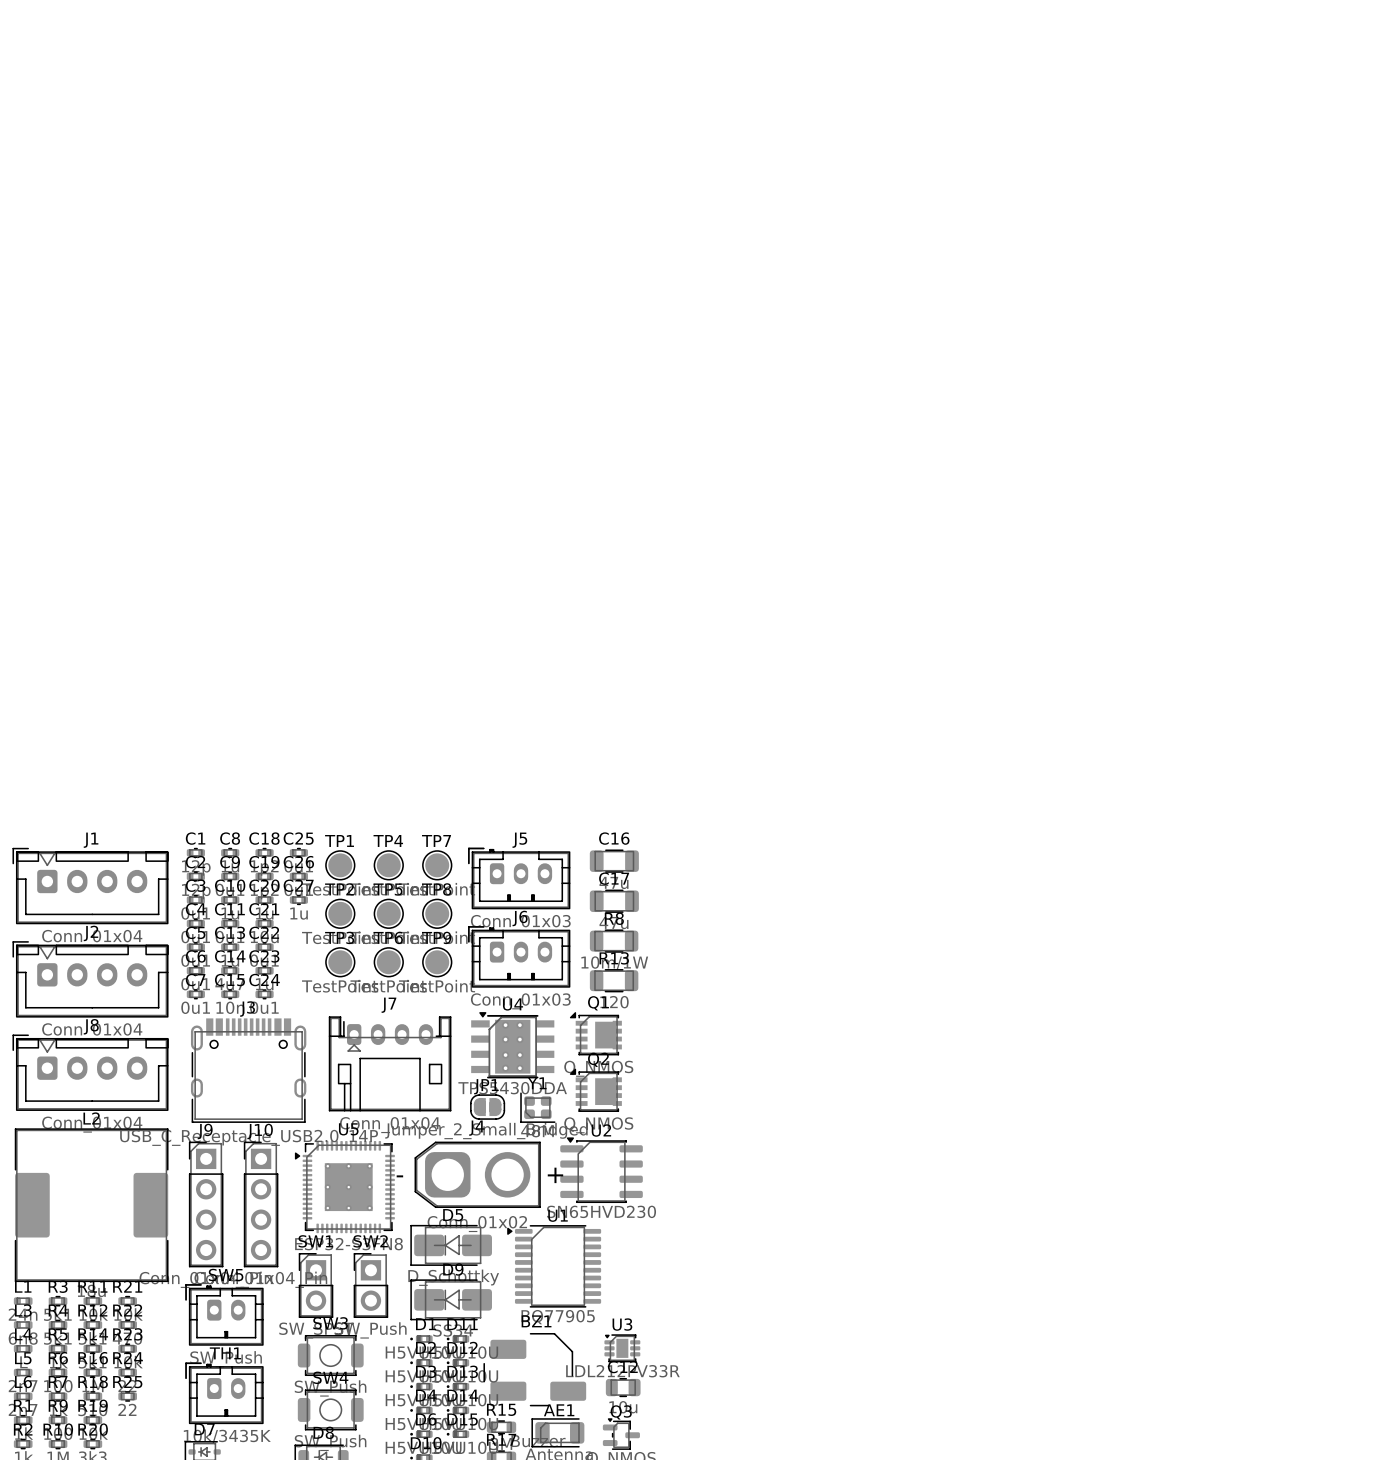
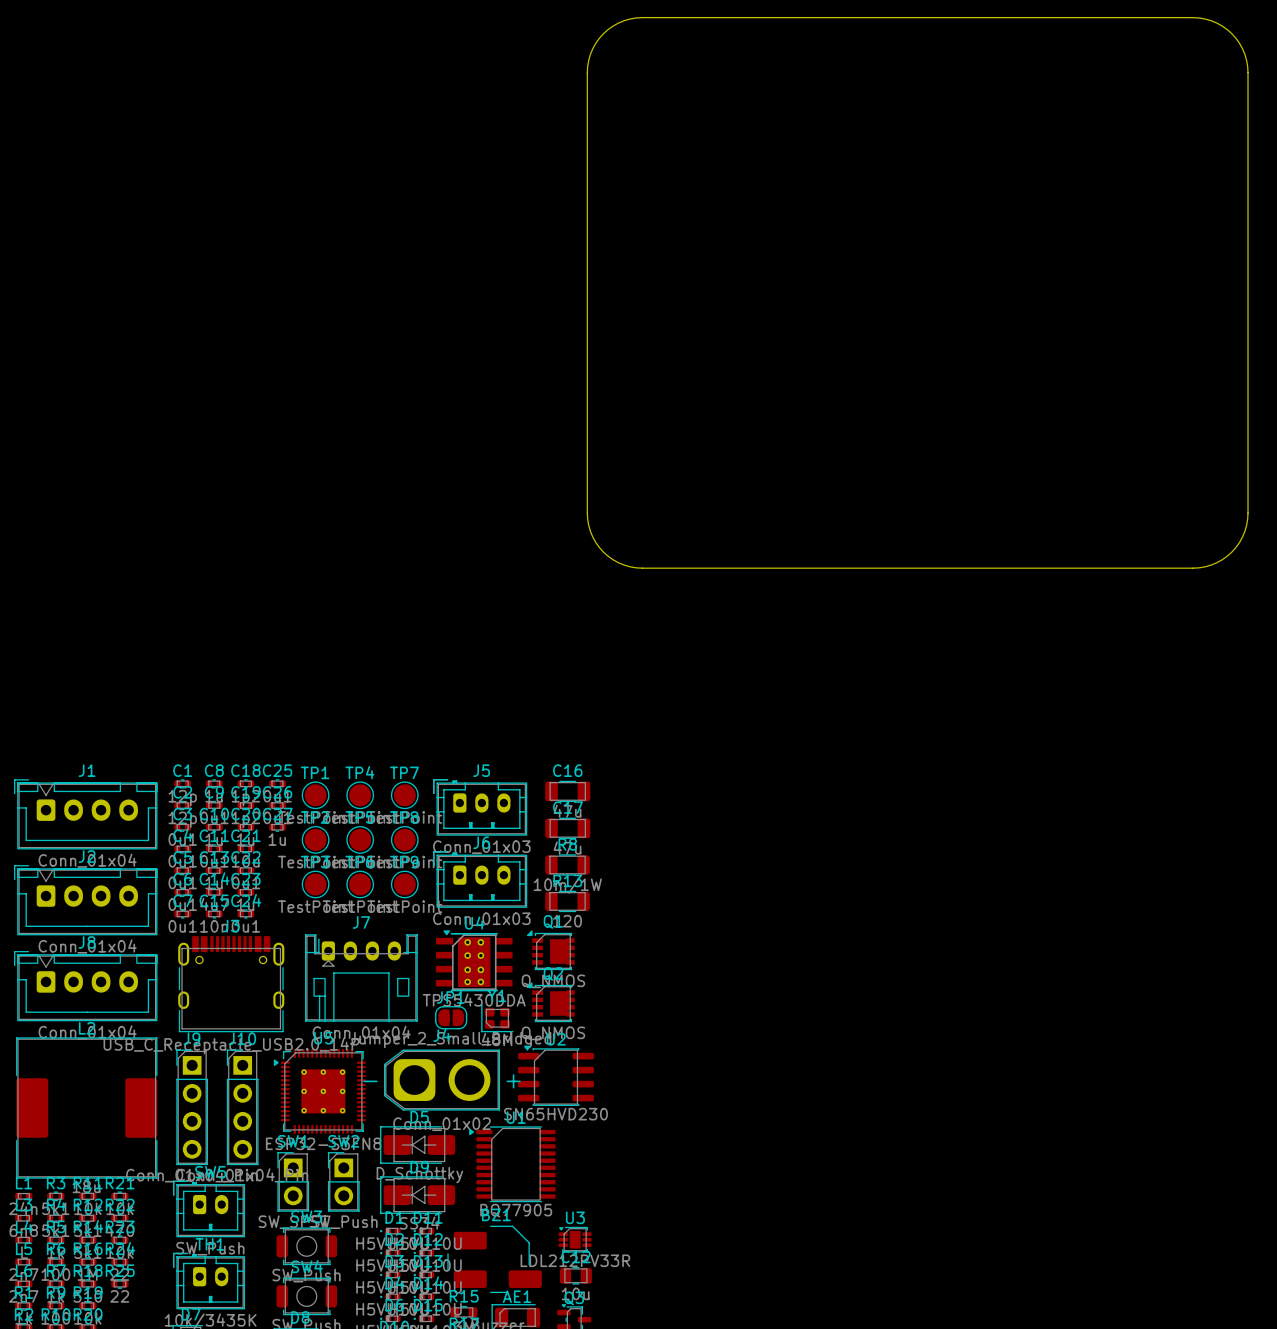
board edge: none -> (642, 17) (1192, 17) (1216, 23) (1231, 33) (1242, 48) (1248, 72) (1248, 513) (1244, 531) (1231, 552) (1211, 565) (1192, 568) (642, 568) (624, 565) (603, 552) (592, 537) (587, 513) (587, 66) (592, 48) (603, 33) (624, 20) (642, 17)

